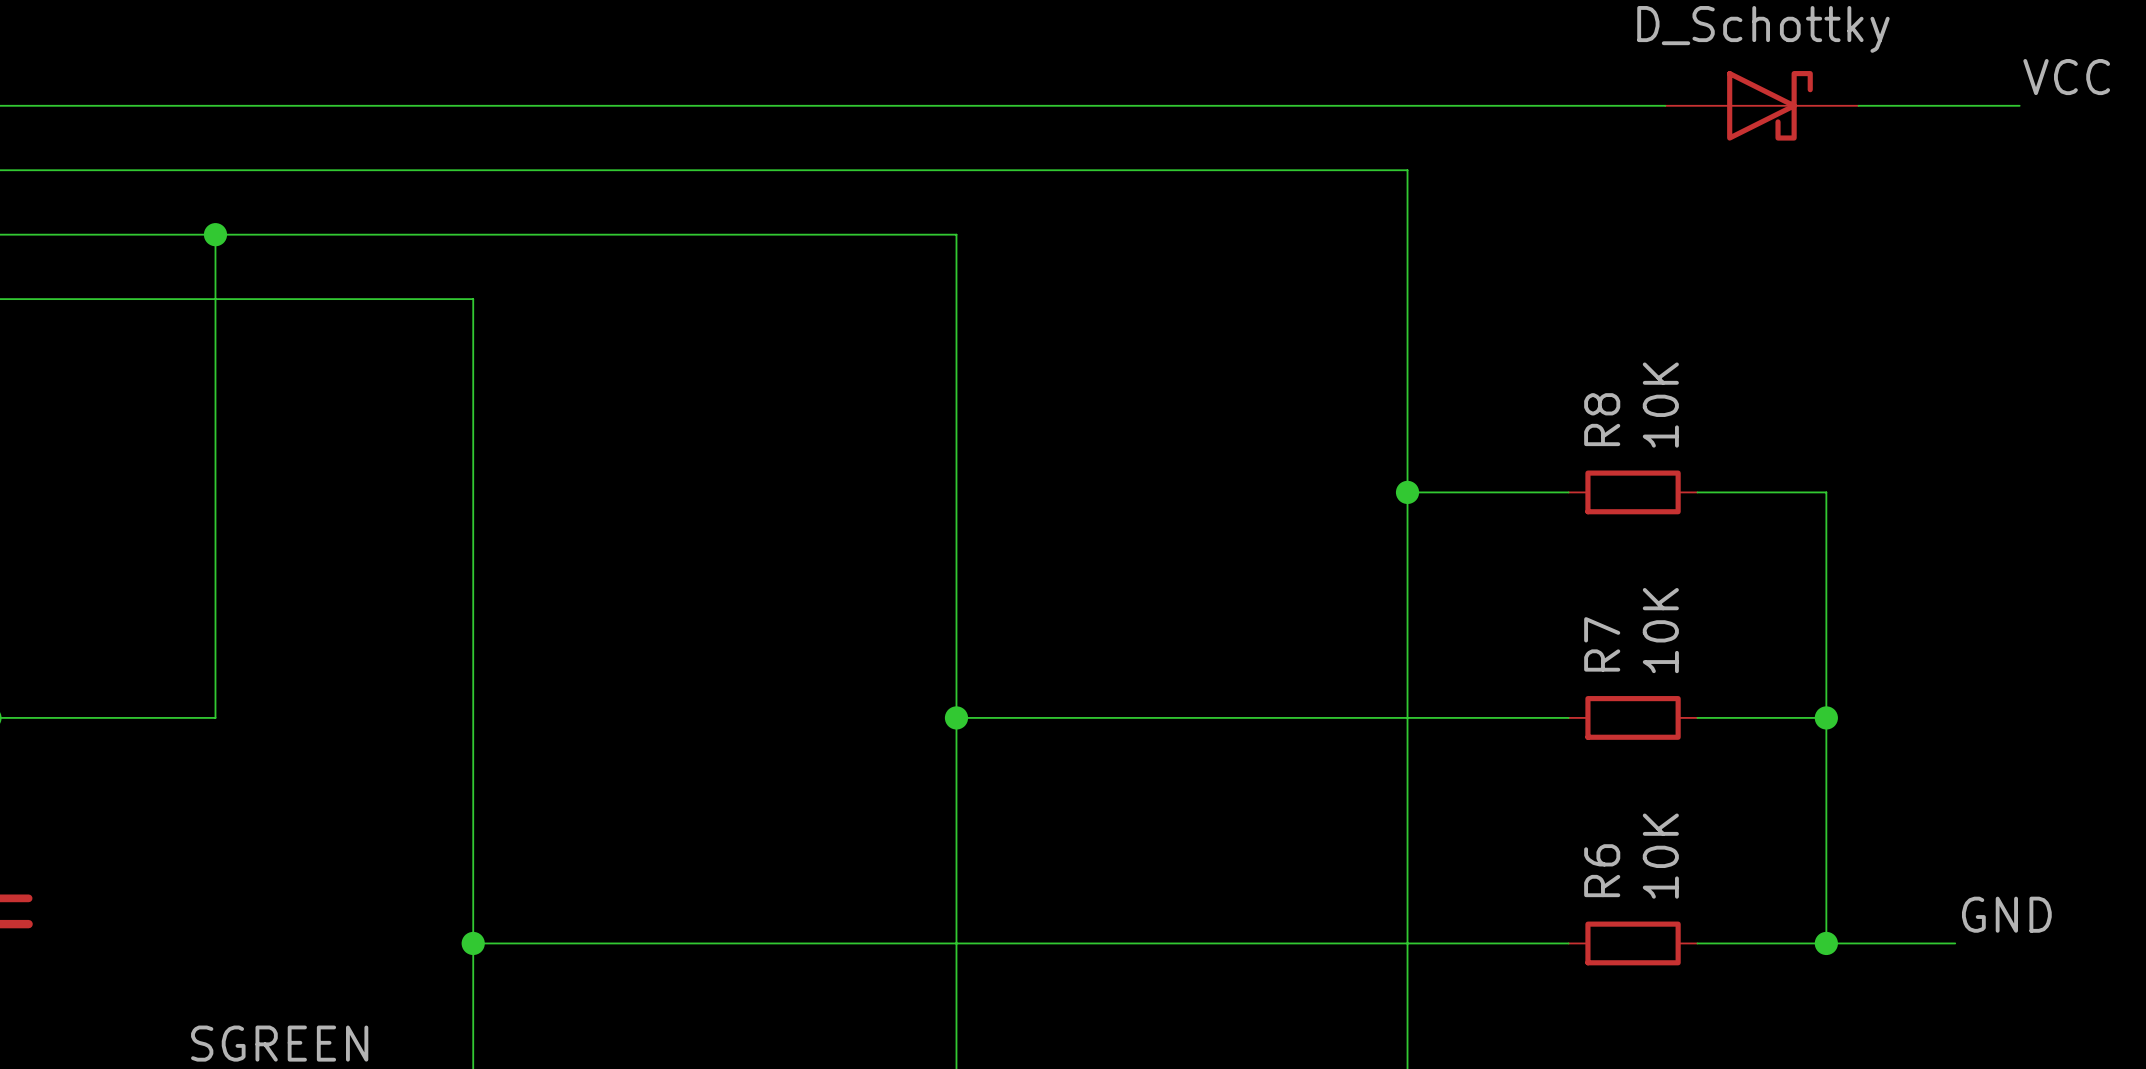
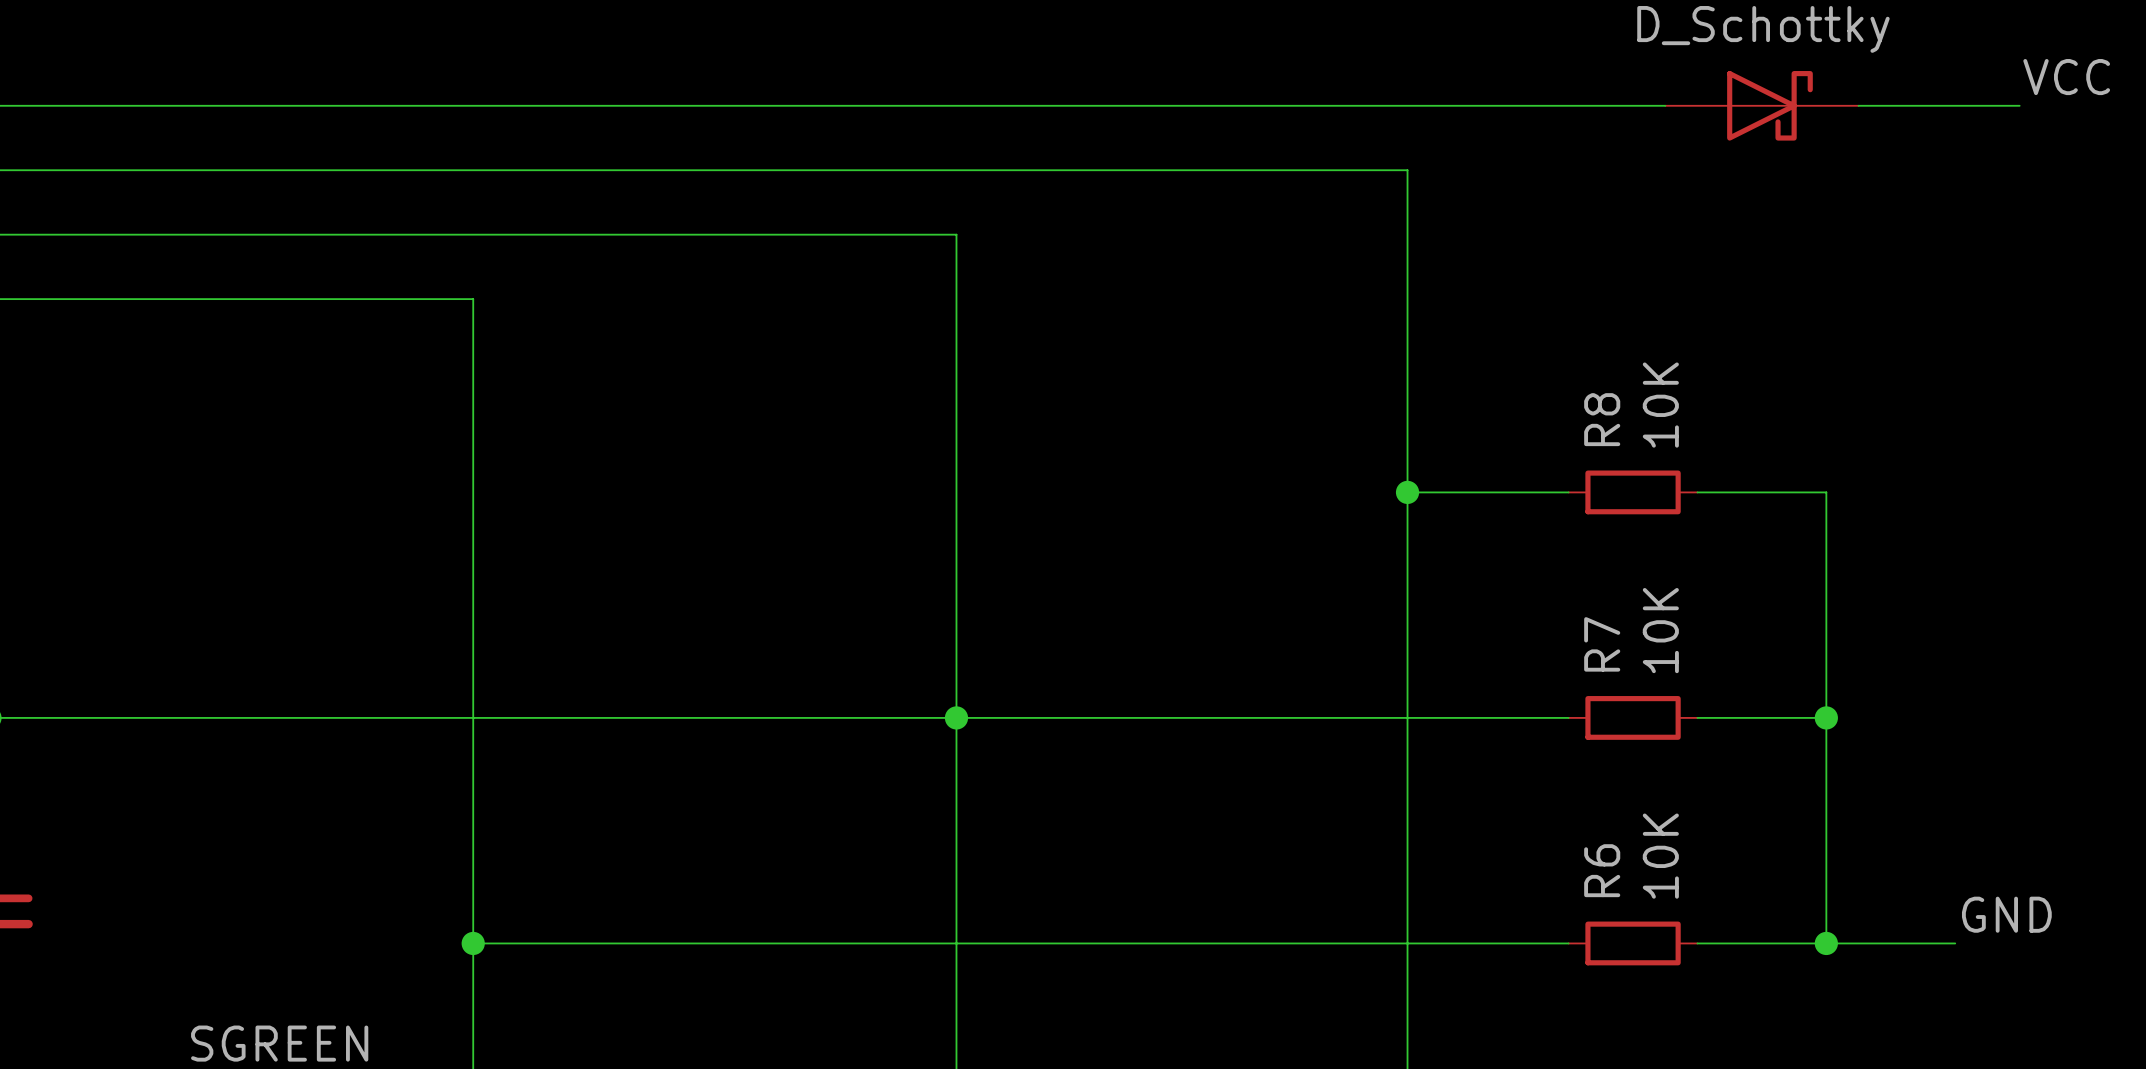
wire: (215, 234) (215, 717) -> (956, 717) (215, 717)
junction: (215, 234) -> none

